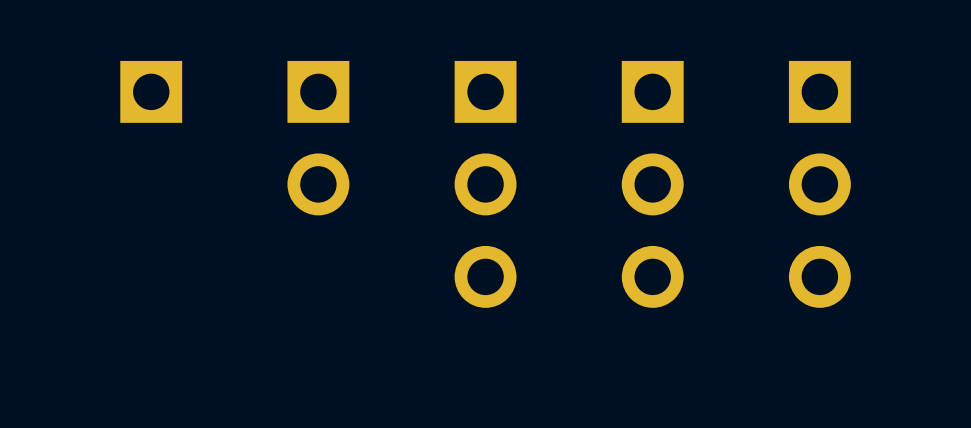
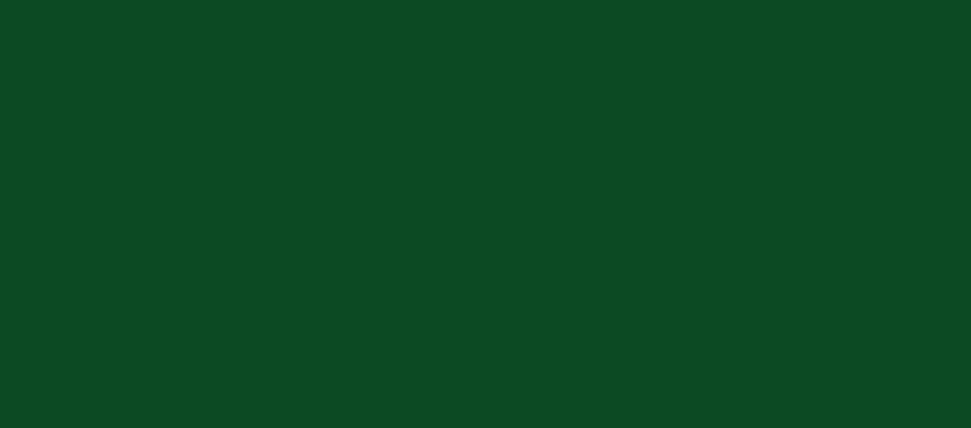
part: (151, 91) -> none
part: (318, 138) -> none
part: (485, 184) -> none
part: (652, 184) -> none
part: (819, 184) -> none

